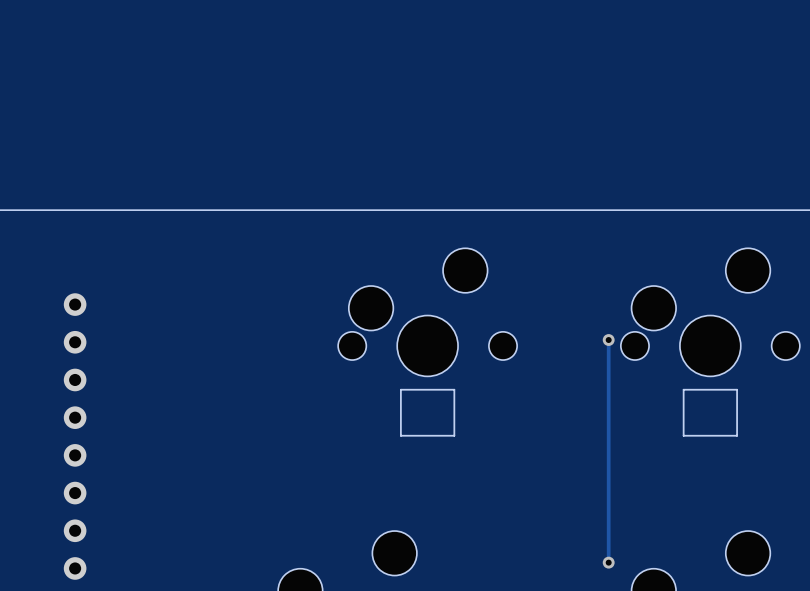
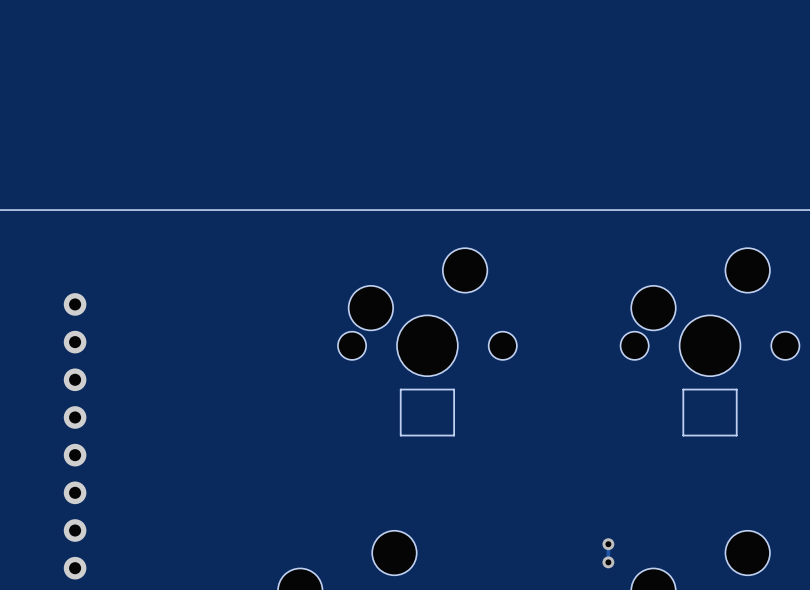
track: (608, 340) (608, 544) -> none
via: (608, 340) -> none
via: none -> (608, 544)

